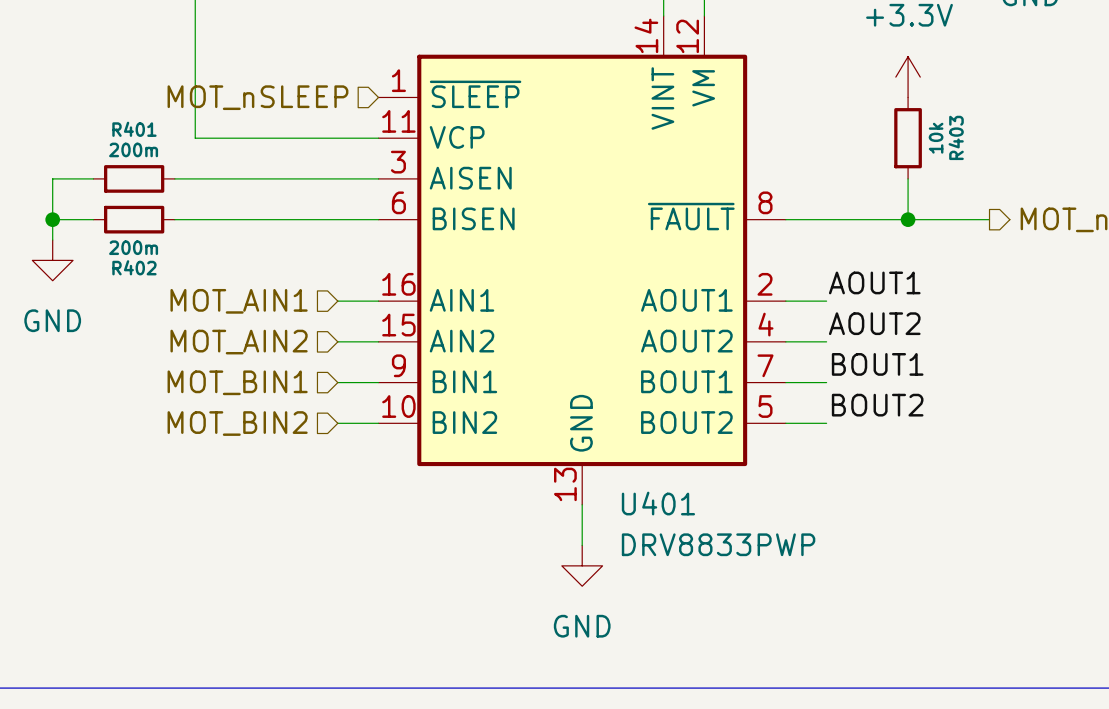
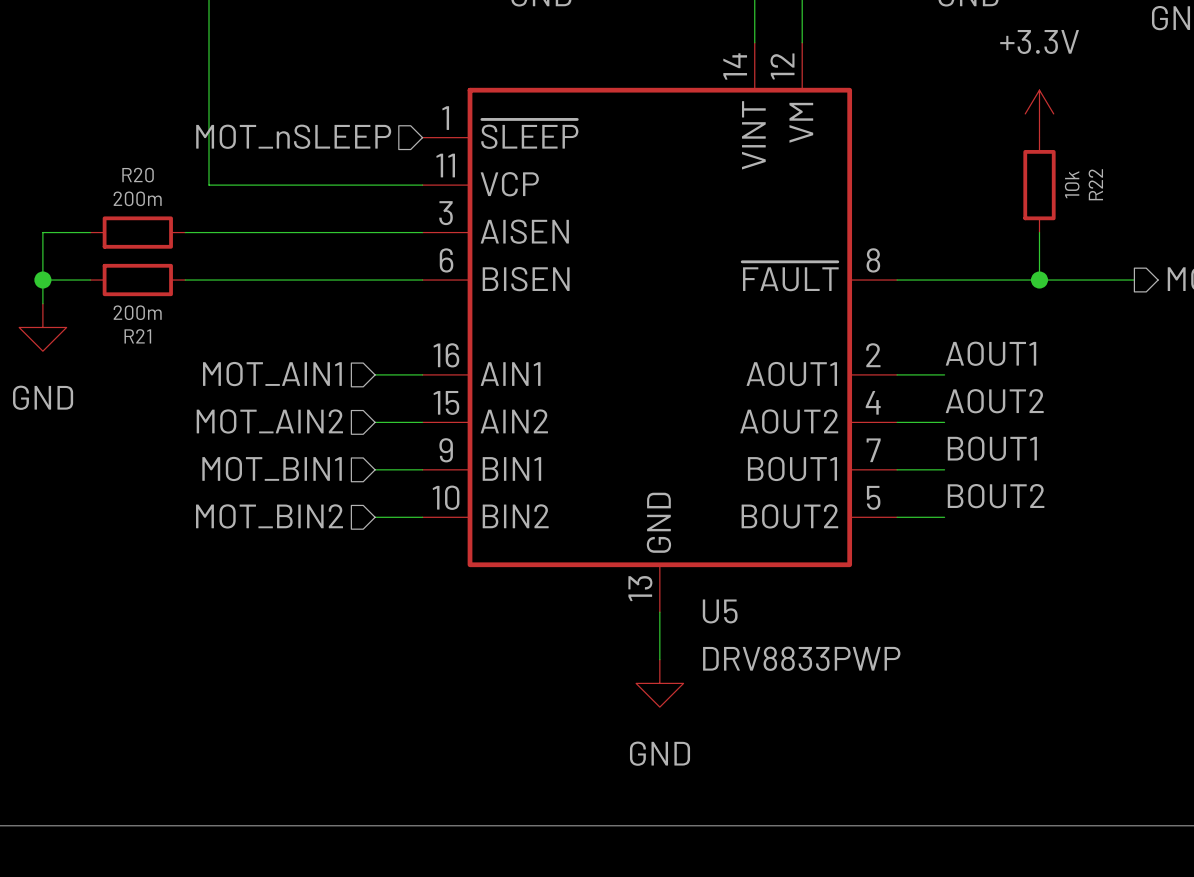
R401 name: R401 (134, 129) -> R20 (138, 175)
R403 name: R403 (956, 137) -> R22 (1095, 184)
R402 name: R402 (134, 267) -> R21 (137, 336)
U401 name: U401 (658, 503) -> U5 (720, 611)

